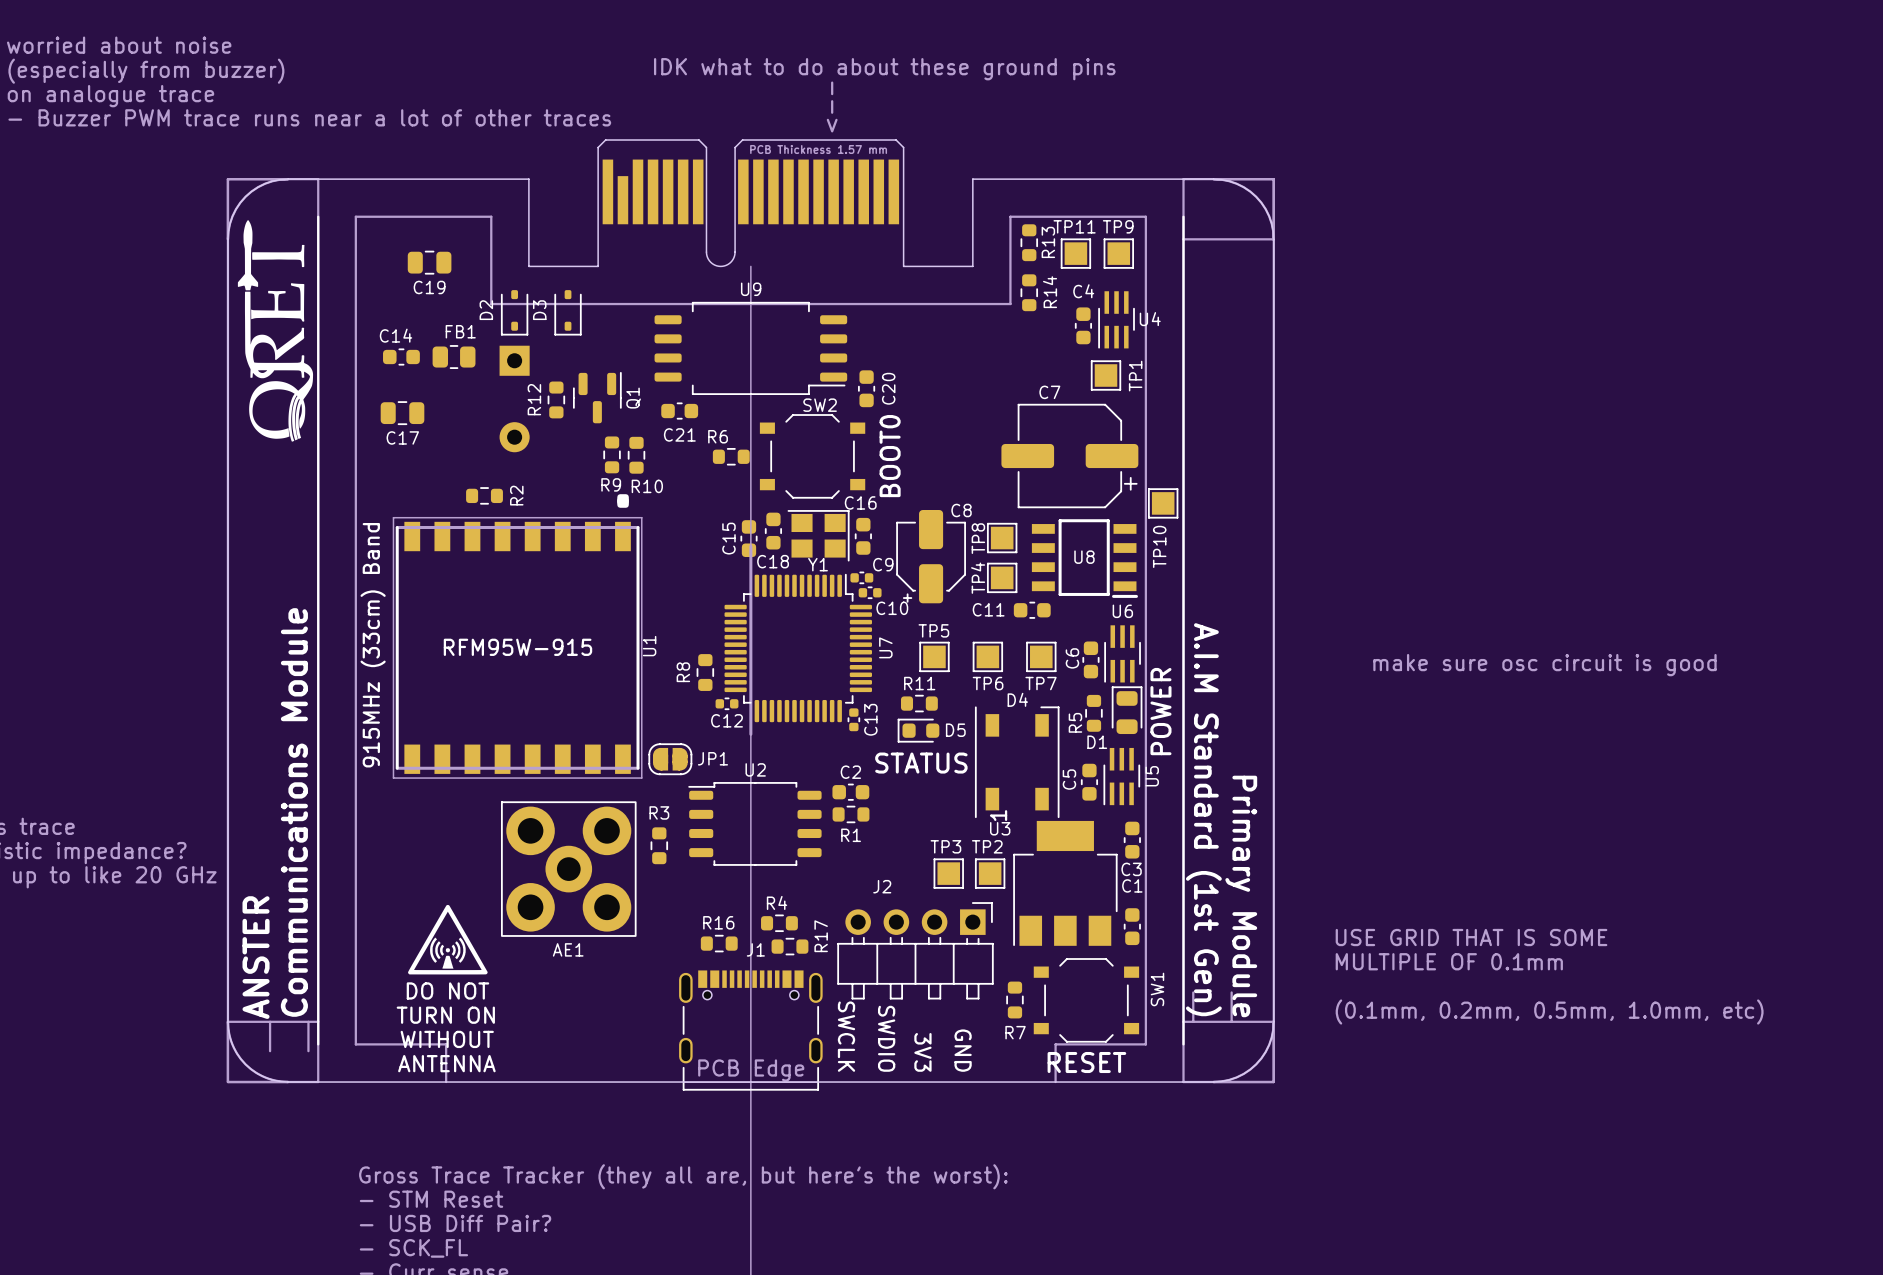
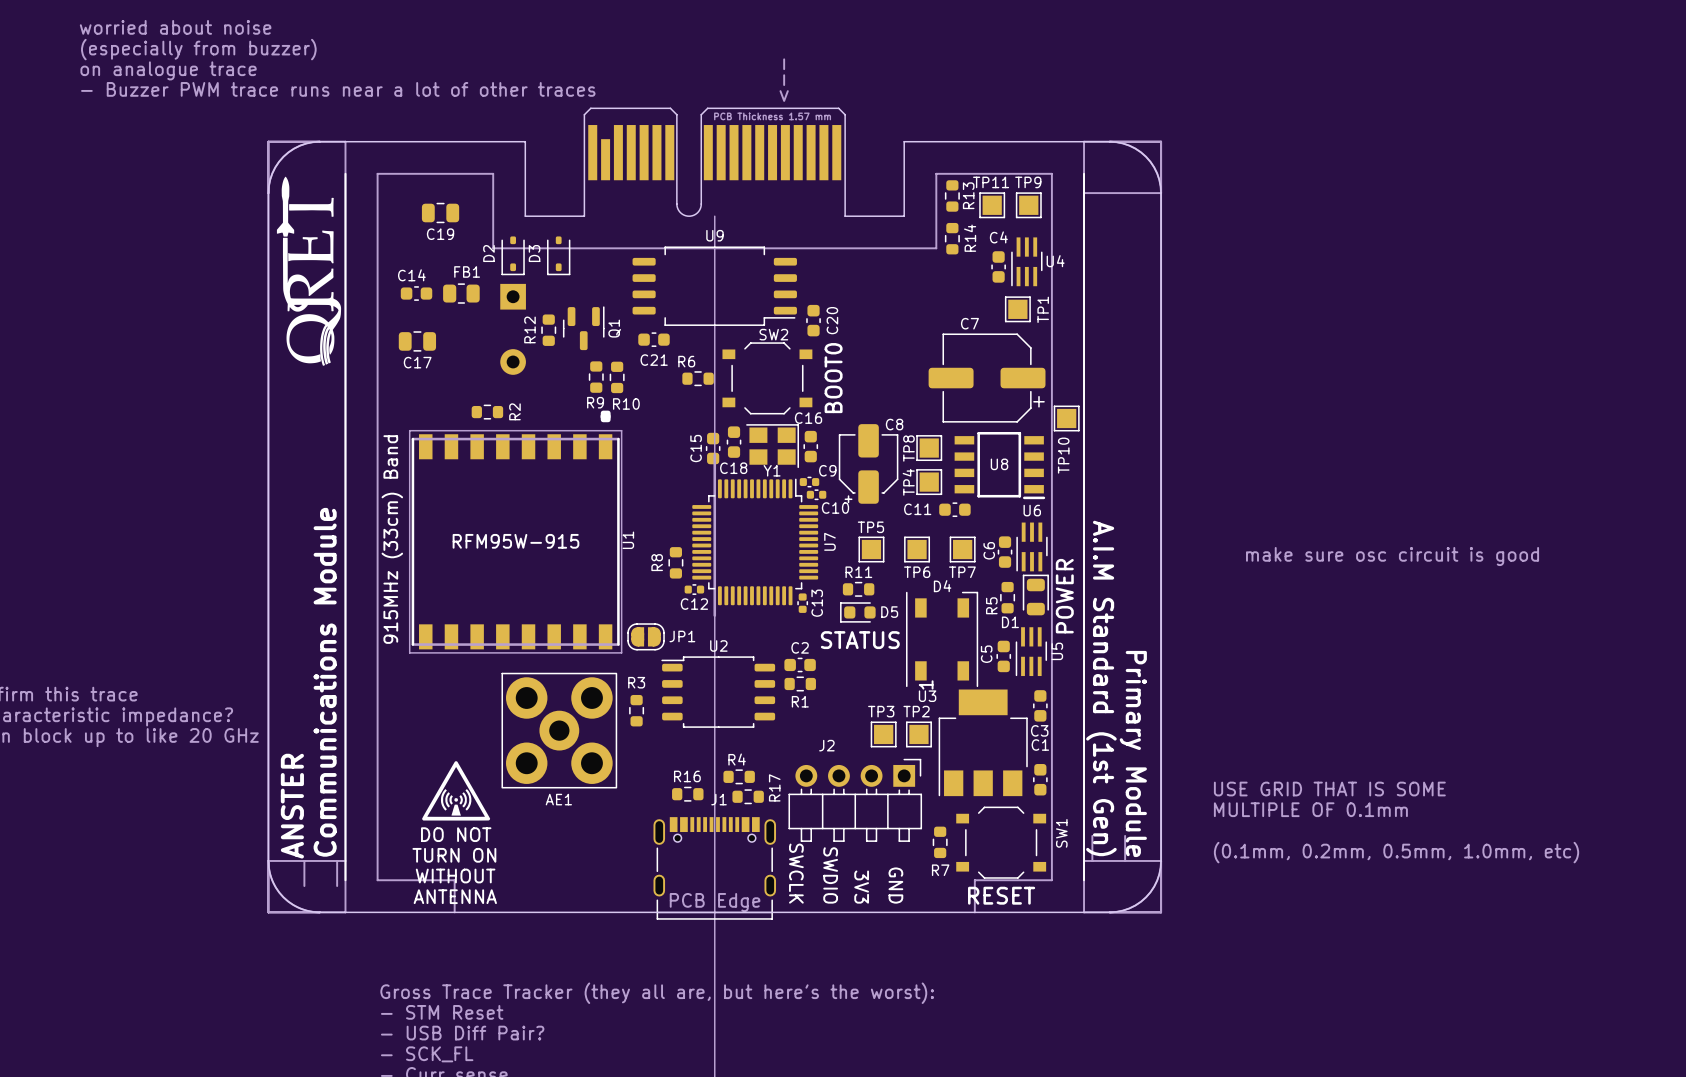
text: IDK what to do about these ground pins (884, 69) -> none

